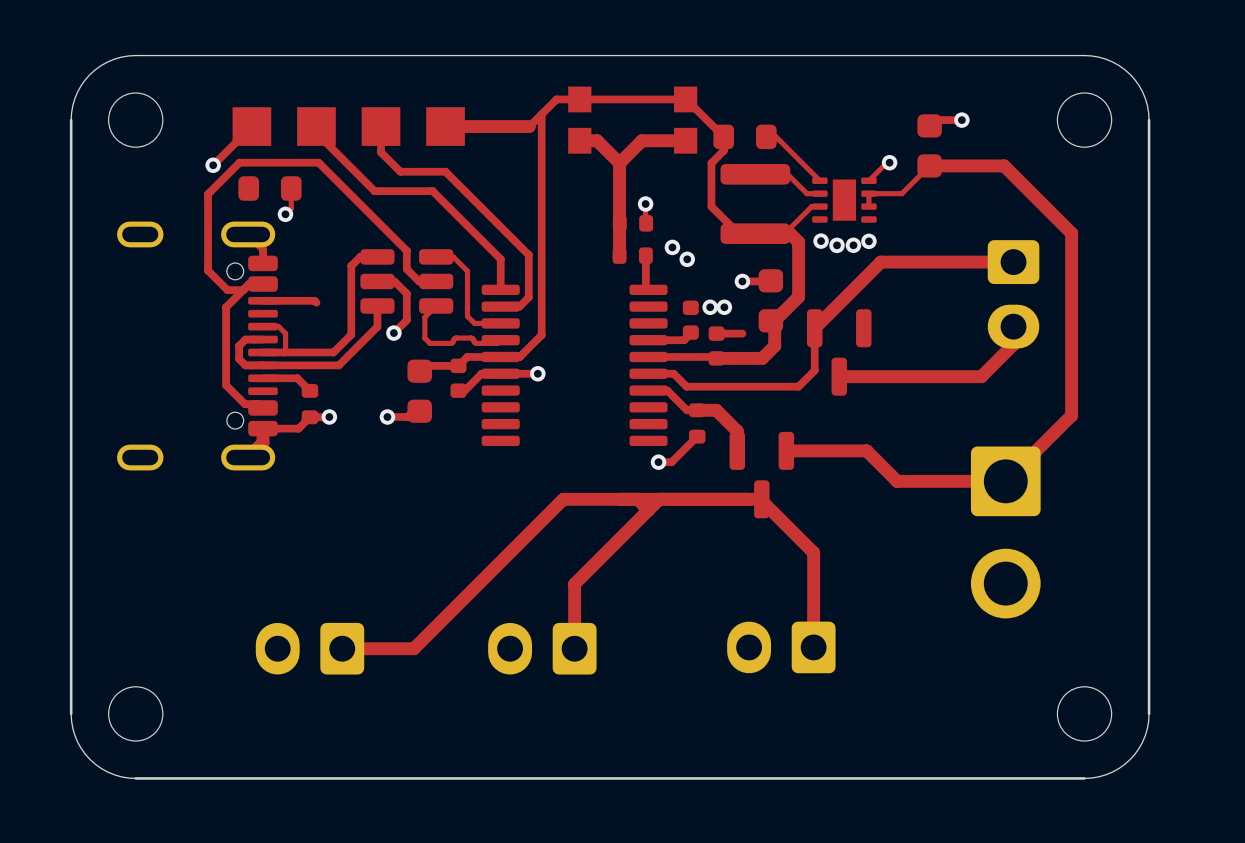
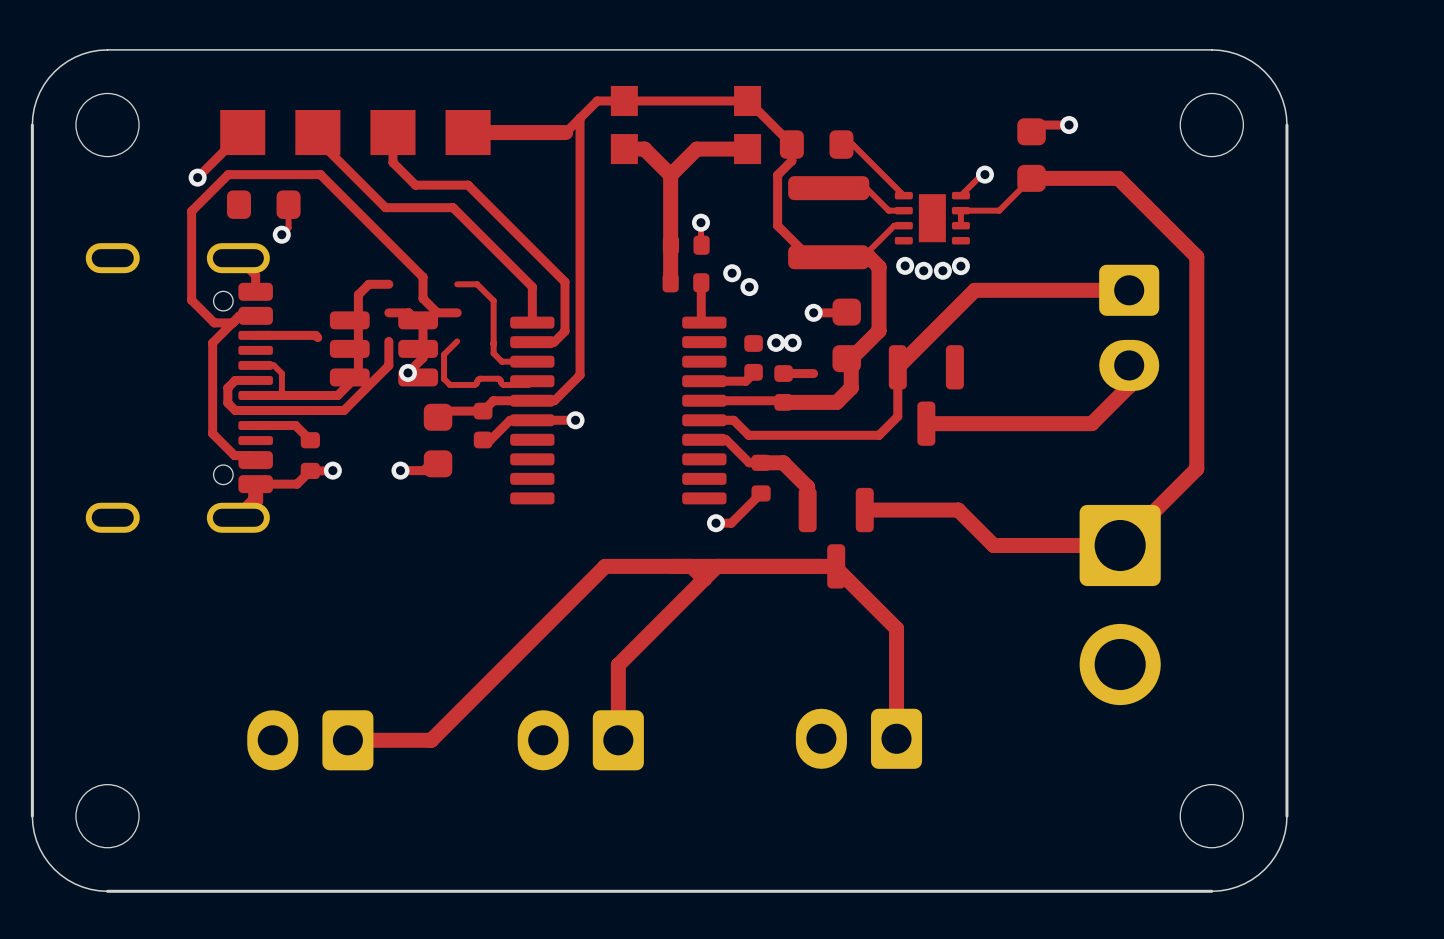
part position: (406, 281) -> (383, 348)

